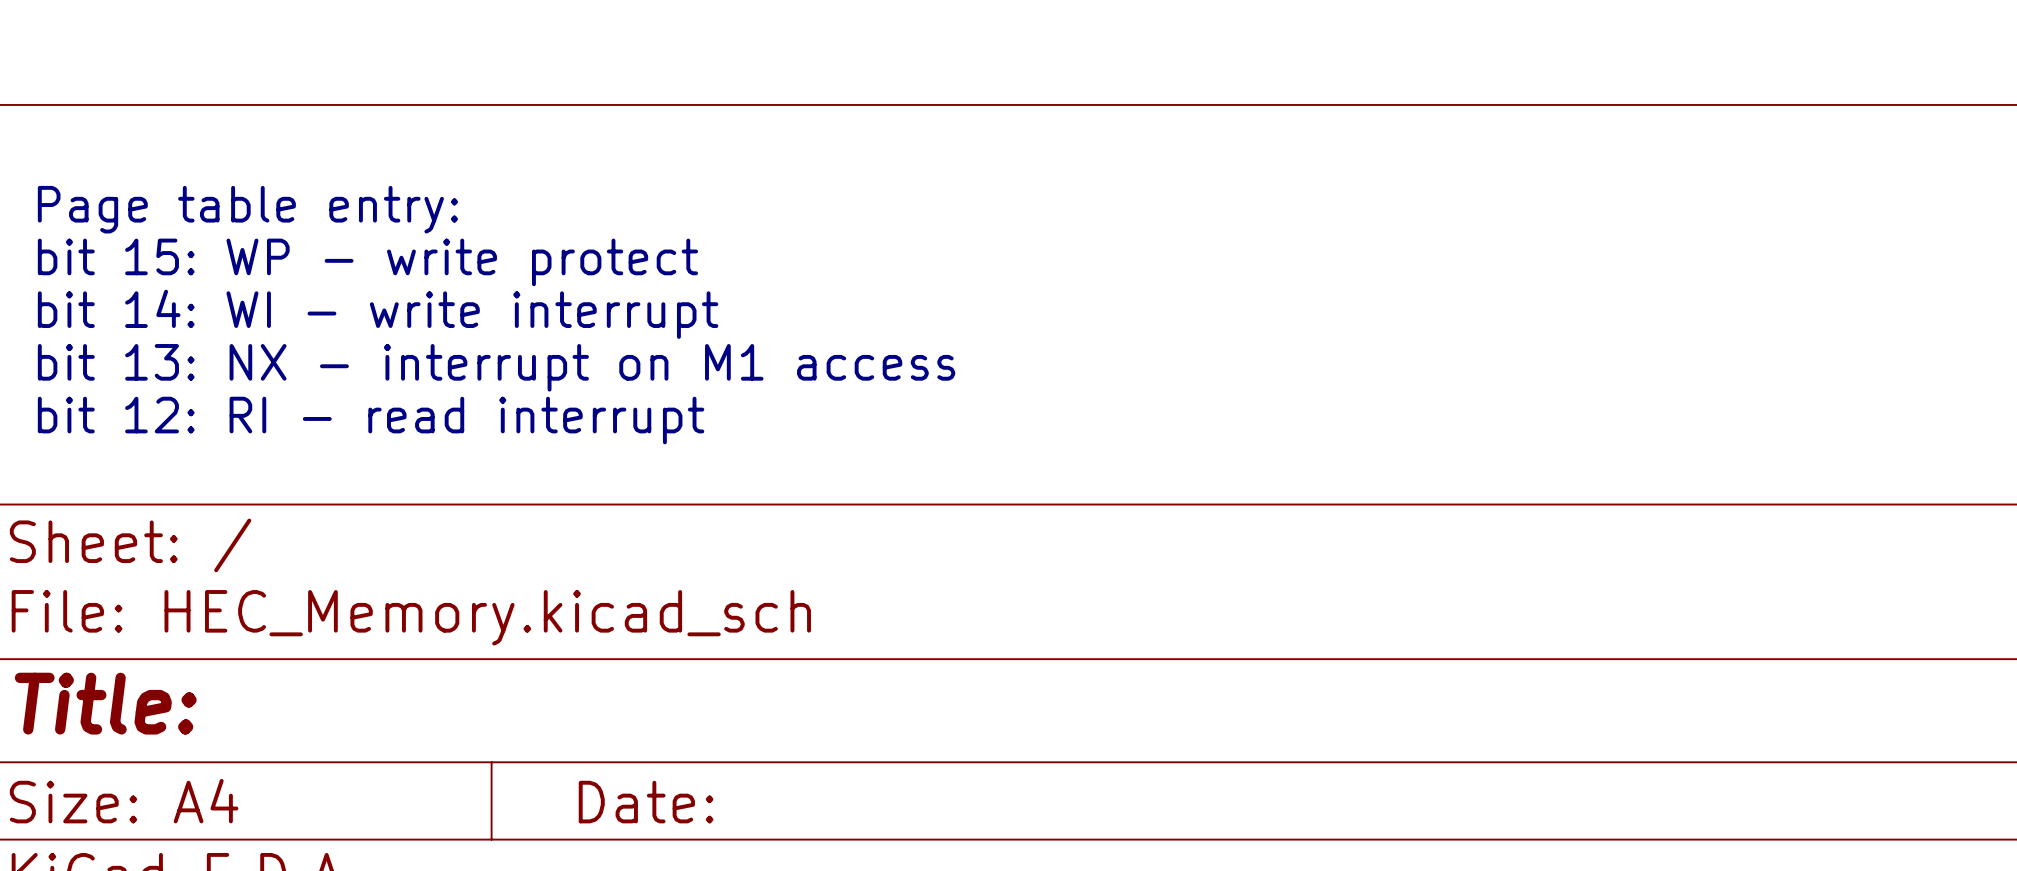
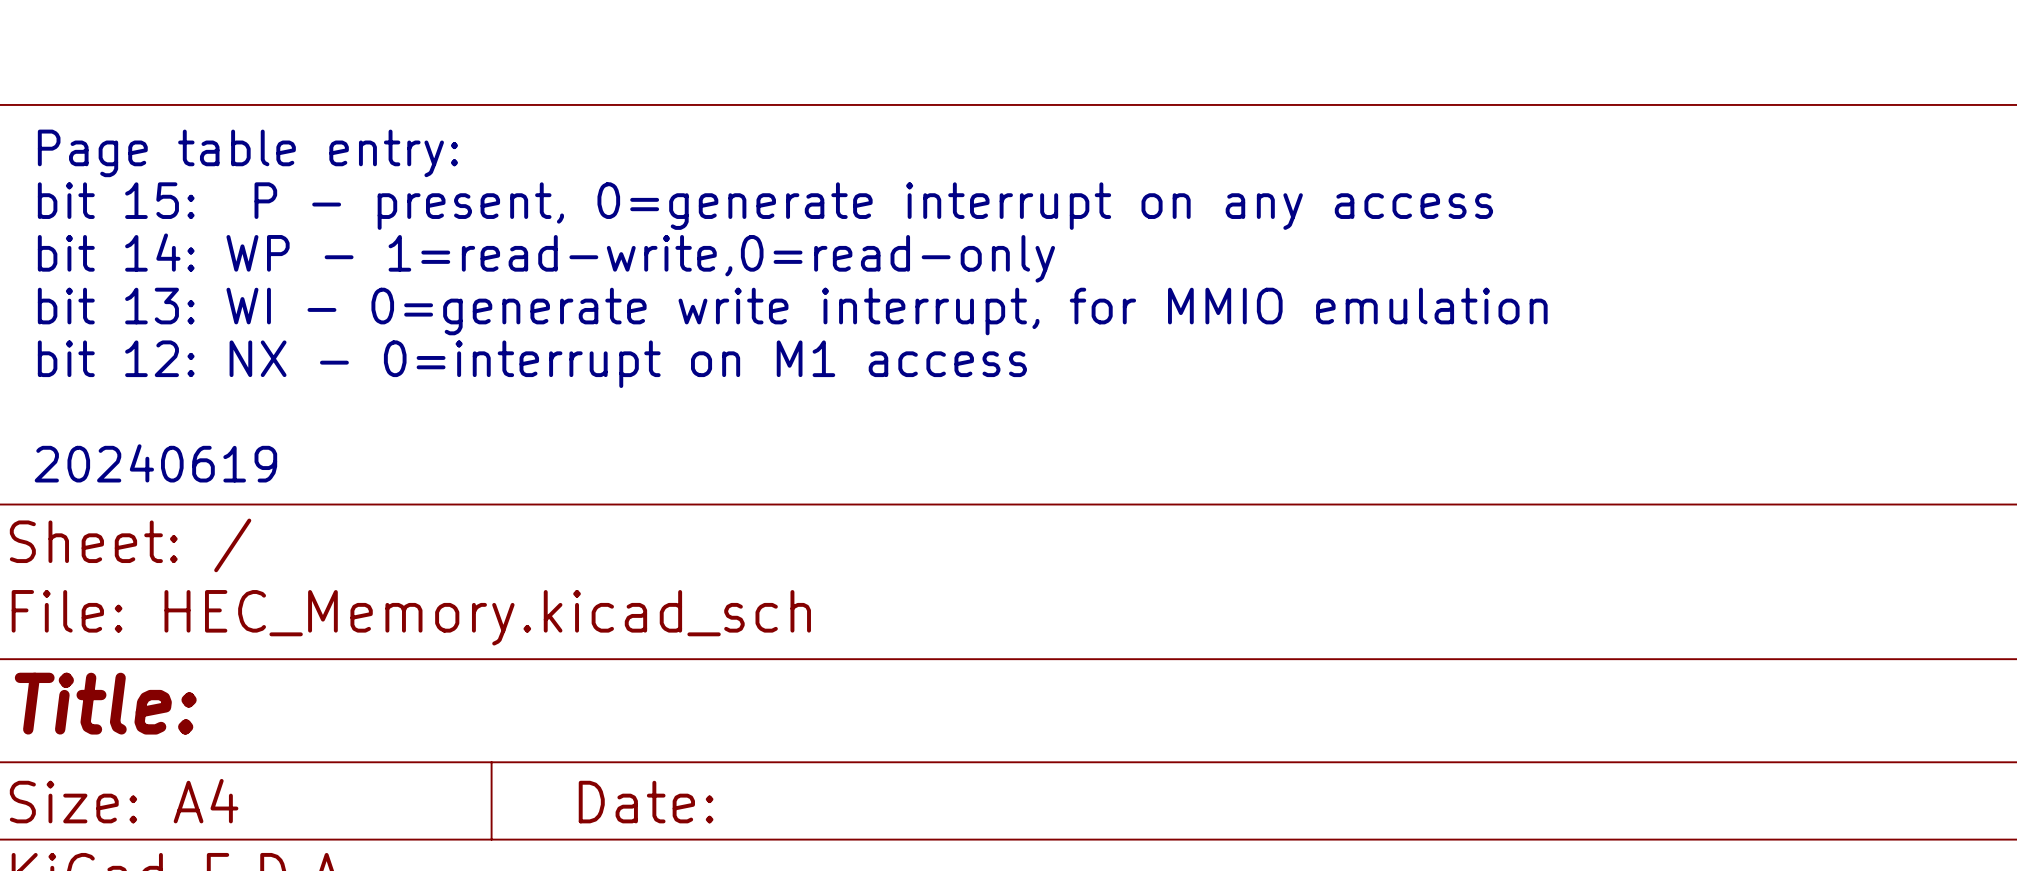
text: none -> bit 15: P - present, 0=generate interrupt on any access (765, 206)
text position: Page table entry: (247, 209) -> Page table entry: (247, 153)
text: bit 15: WP - write protect (367, 262) -> bit 14: WP - 1=read-write,0=read-only (546, 258)
text: bit 14: WI - write interrupt (378, 314) -> bit 13: WI - 0=generate write interrupt, for MMIO emulation (792, 311)
text: bit 13: NX - interrupt on M1 access (496, 367) -> bit 12: NX - 0=interrupt on M1 access (532, 364)
text: bit 12: RI - read interrupt (371, 420) -> none
text: none -> 20240619 (155, 463)

